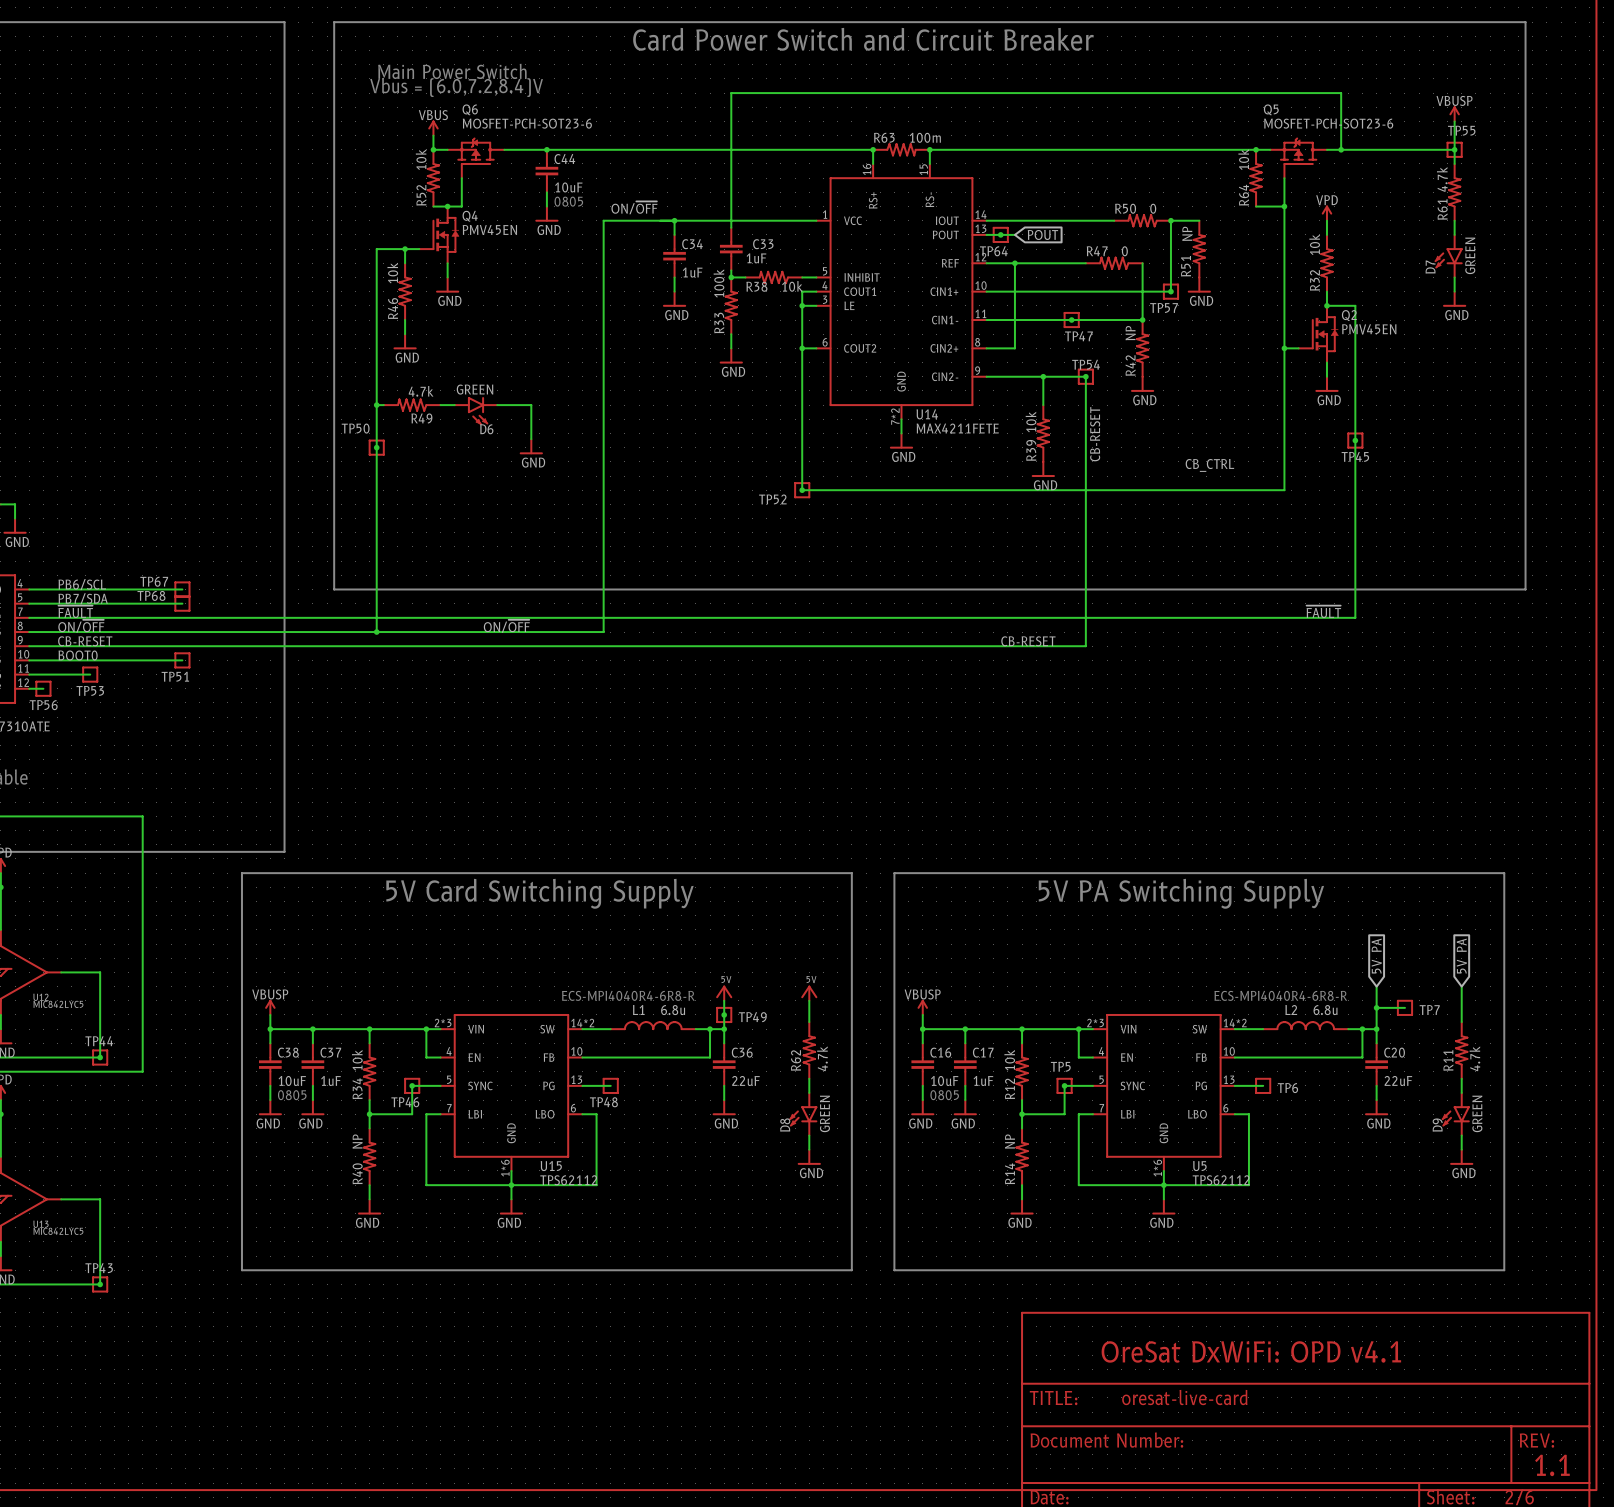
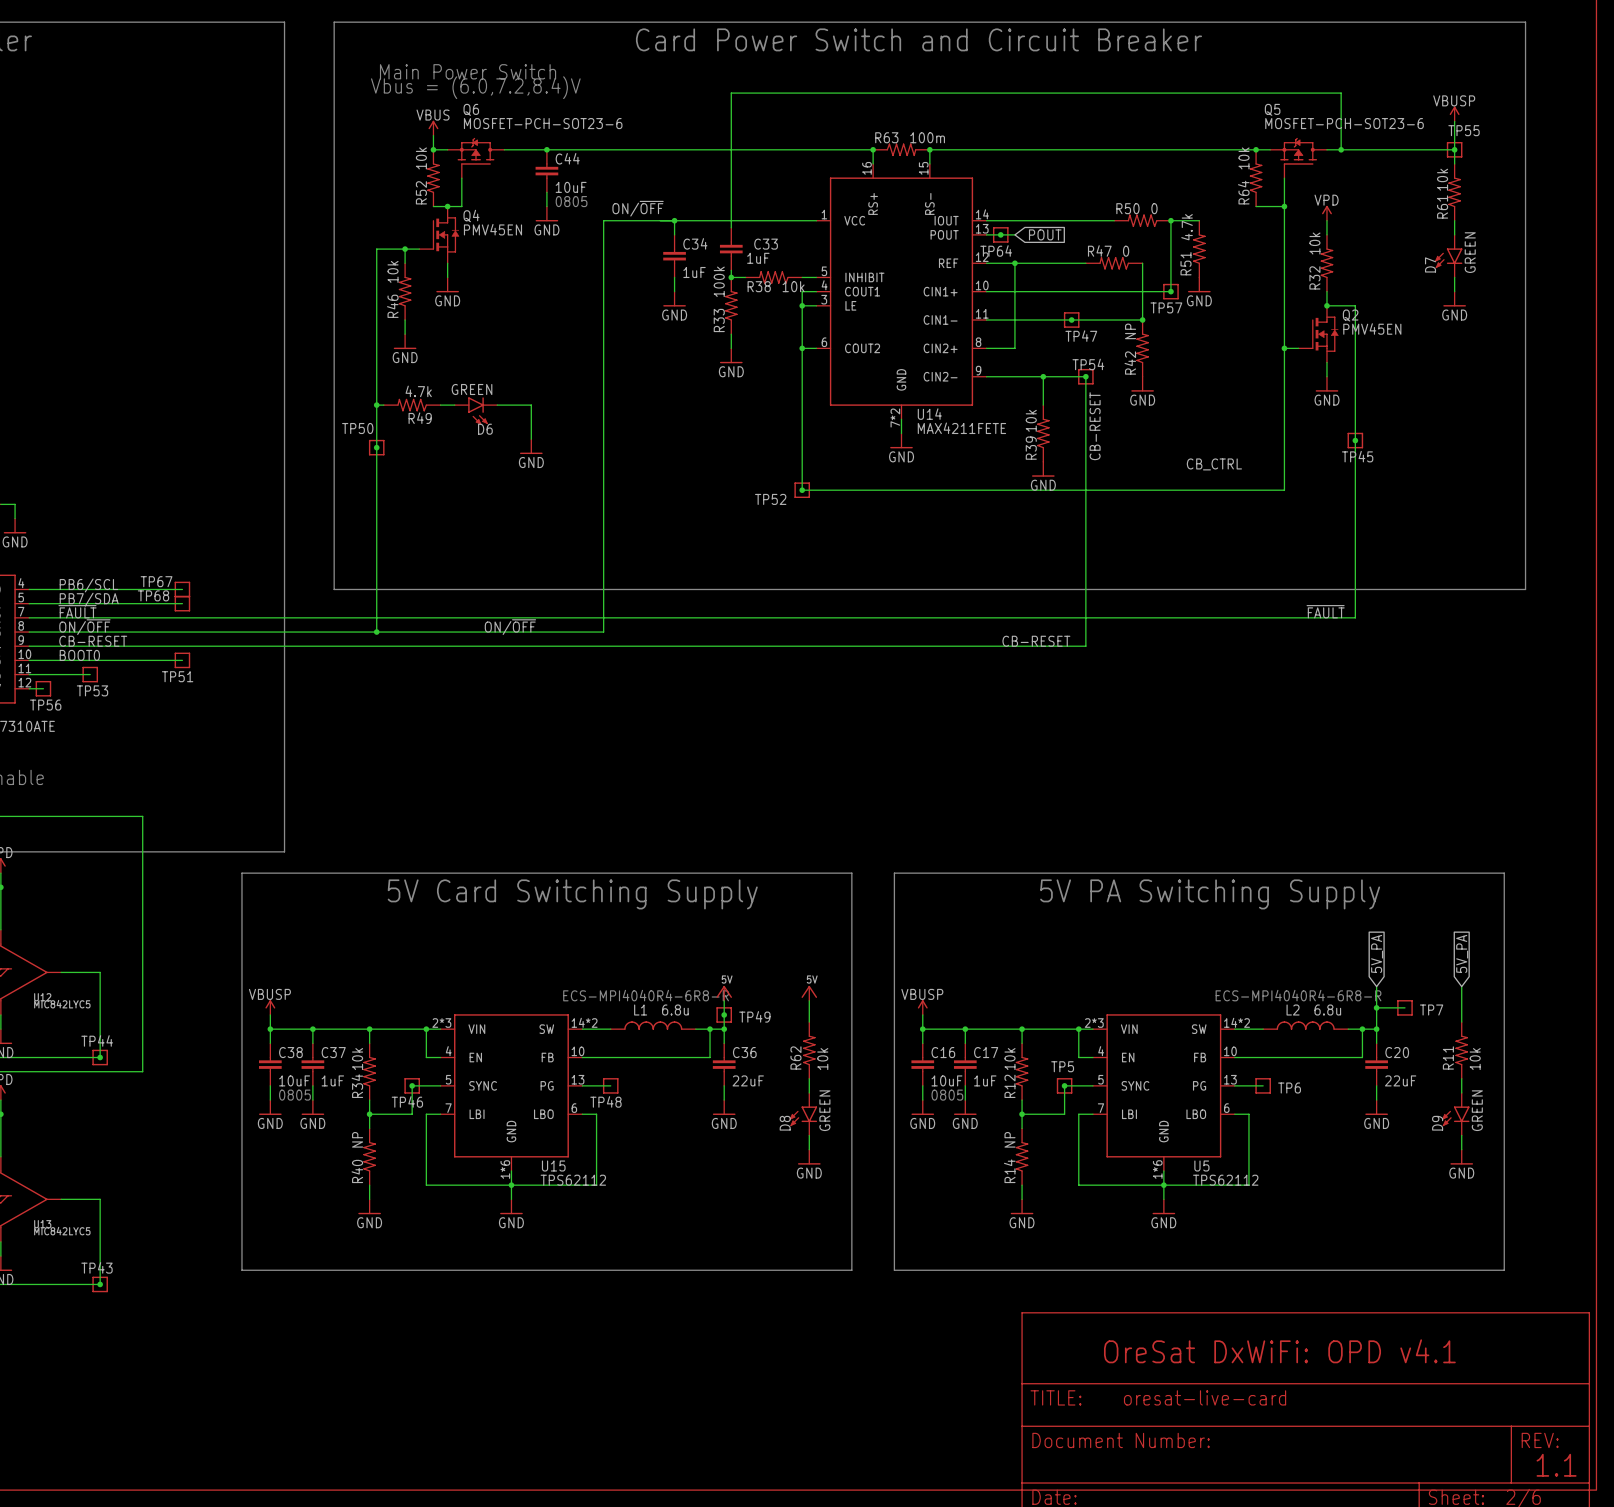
R61 value: 4.7k (1442, 179) -> 10k (1442, 179)
R51 value: NP (1187, 233) -> 4.7k (1187, 227)
R62 value: 4.7k (822, 1058) -> 10k (822, 1059)
R11 value: 4.7k (1474, 1058) -> 10k (1475, 1059)

